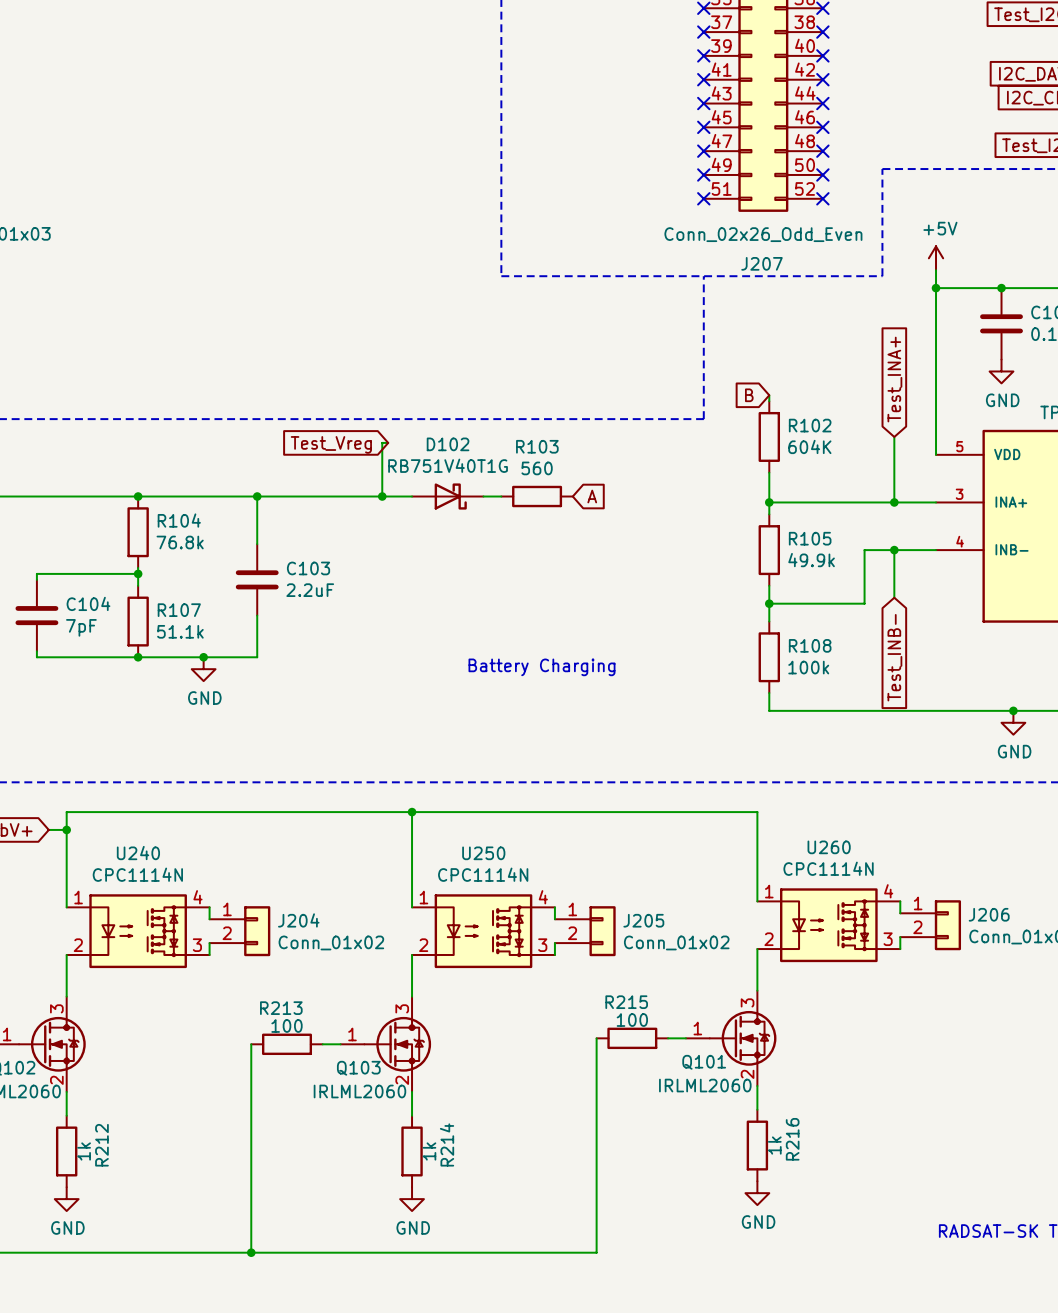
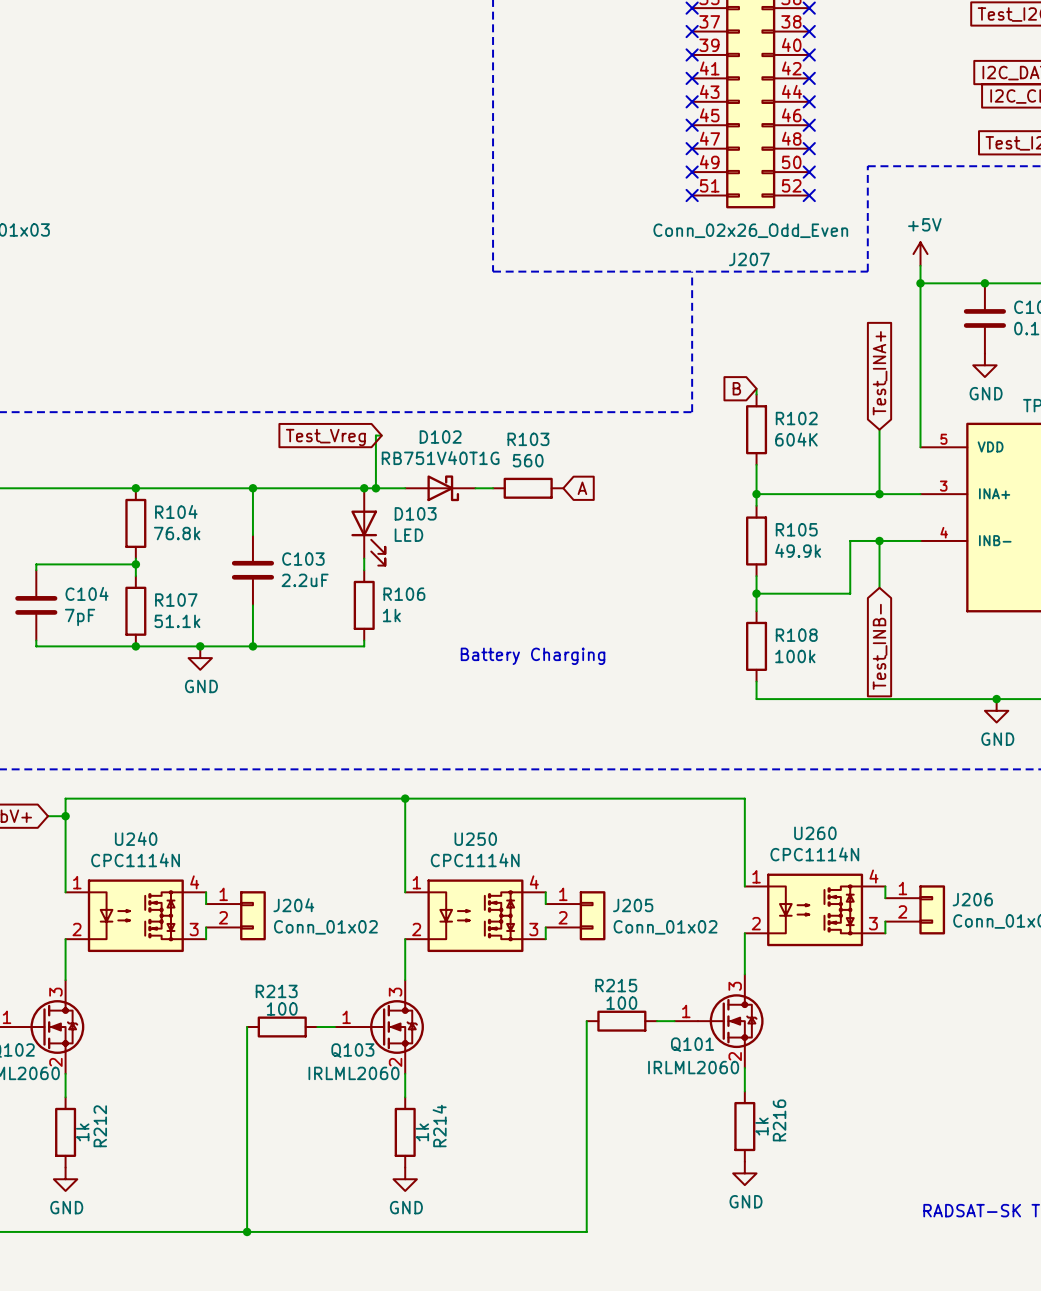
junction: none -> (364, 488)
D103: none -> LED (368, 526)
wire: none -> (364, 558) (364, 570)
R106: none -> 1k (364, 605)
wire: none -> (364, 640) (364, 646) (252, 646)
junction: none -> (252, 646)

